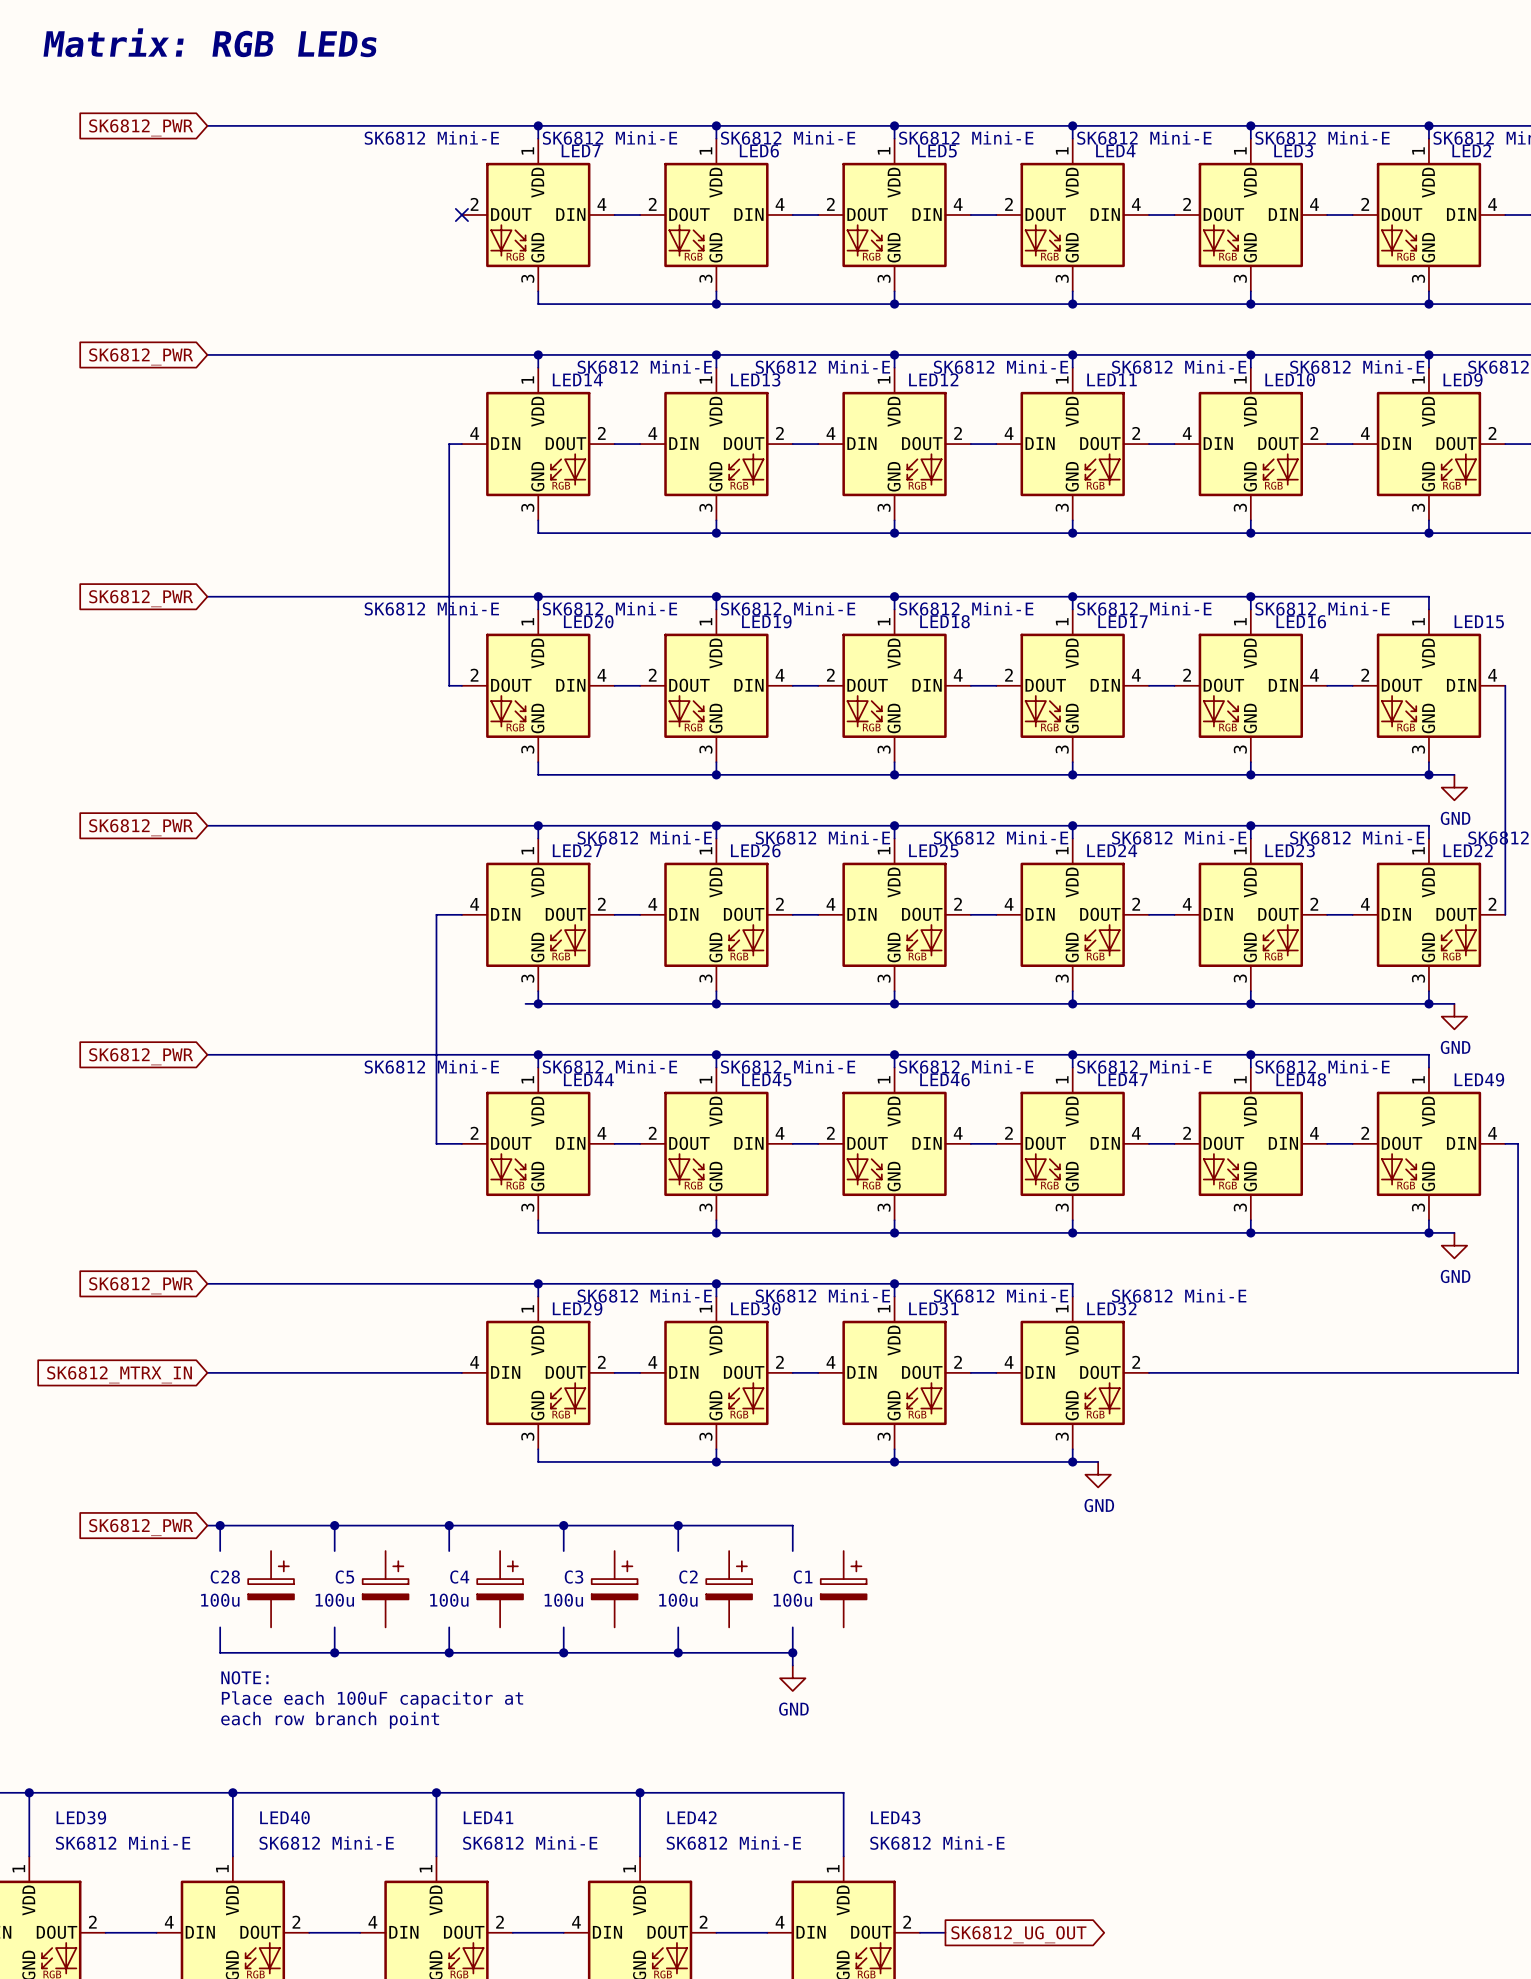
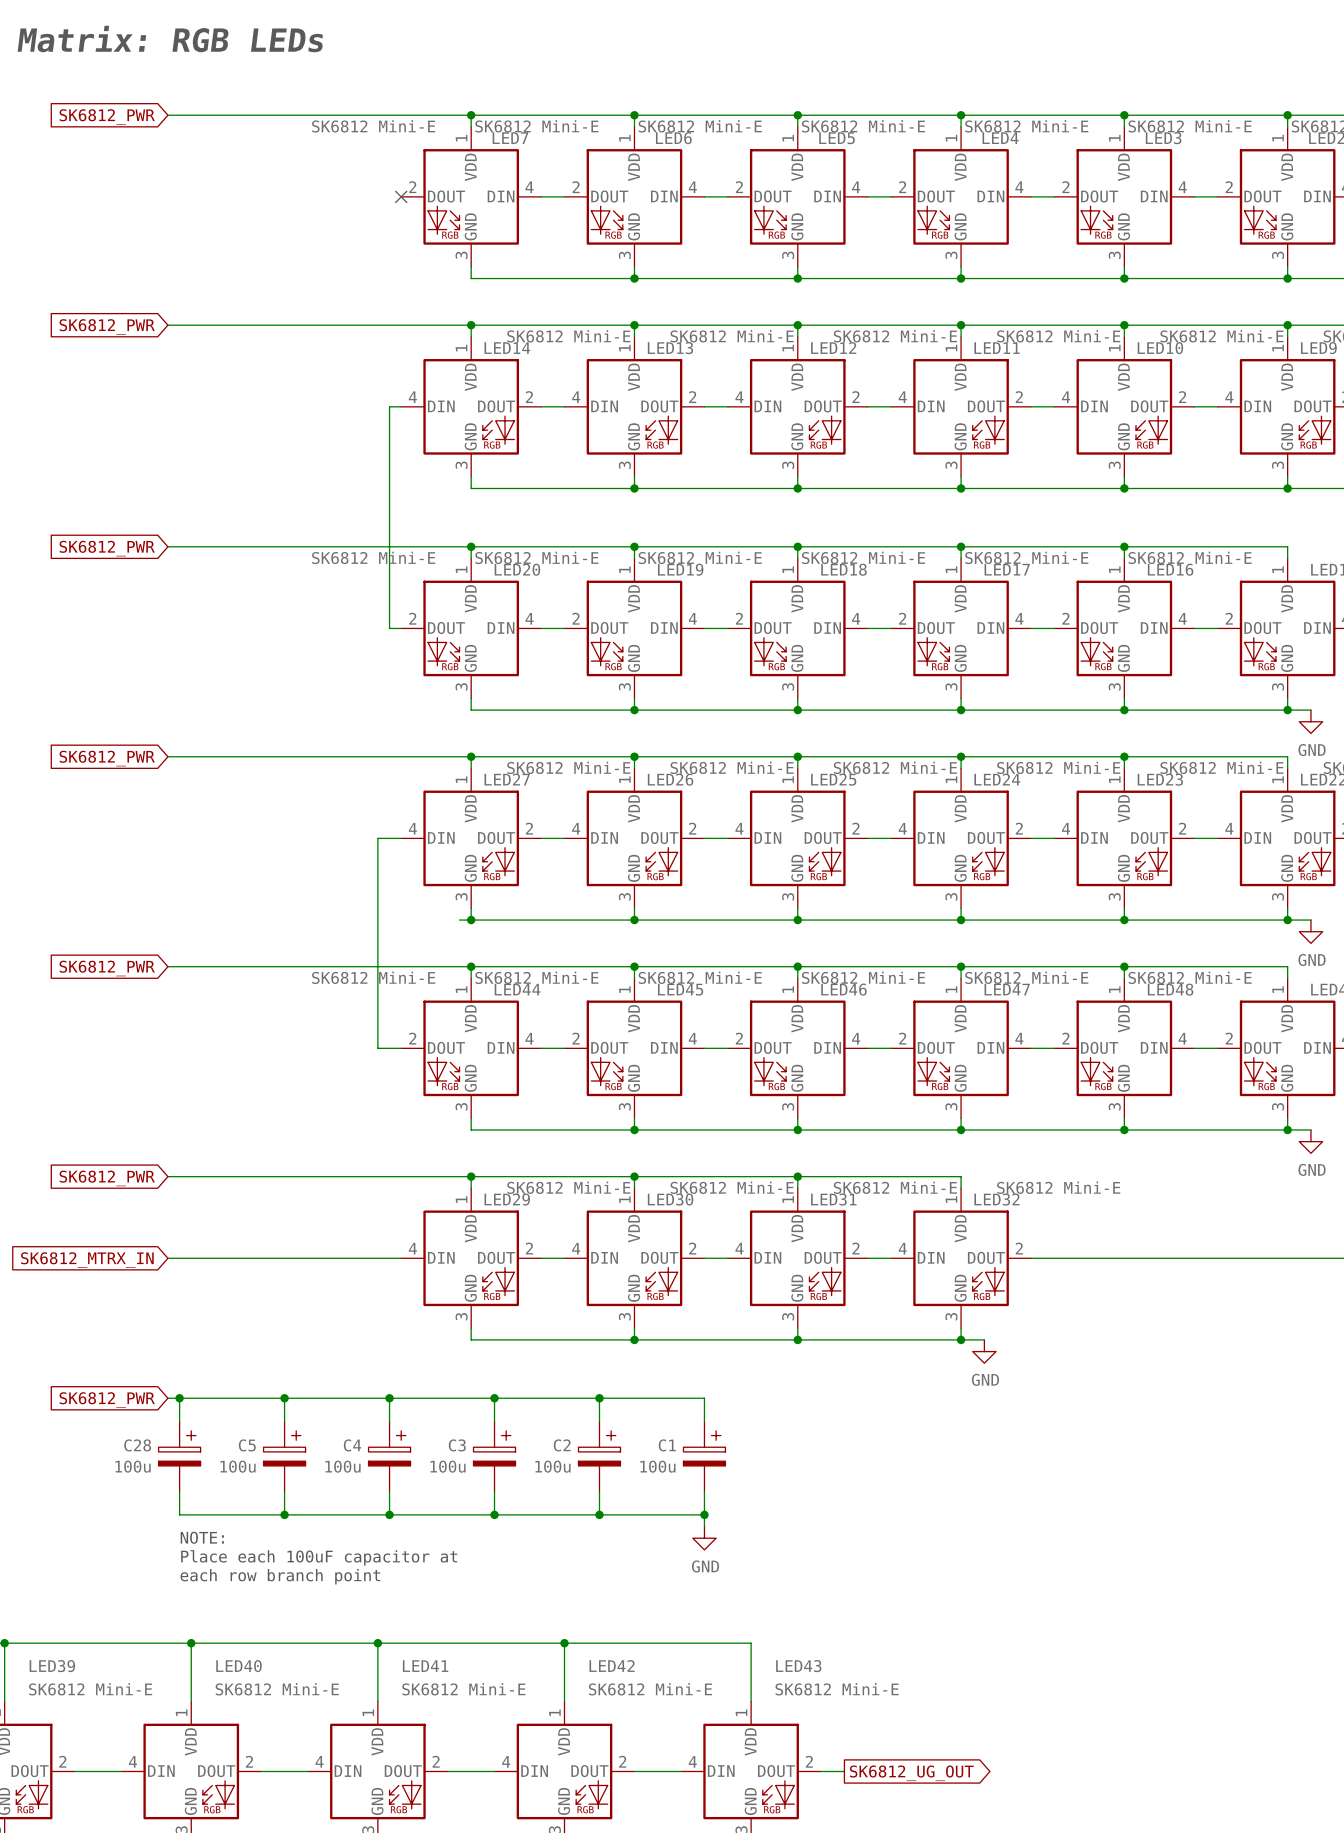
C28 position: (271, 1589) -> (179, 1456)
C5 position: (385, 1589) -> (284, 1456)
C4 position: (500, 1589) -> (389, 1456)
C3 position: (614, 1589) -> (494, 1456)
C2 position: (729, 1589) -> (599, 1456)
C1 position: (843, 1589) -> (704, 1456)

